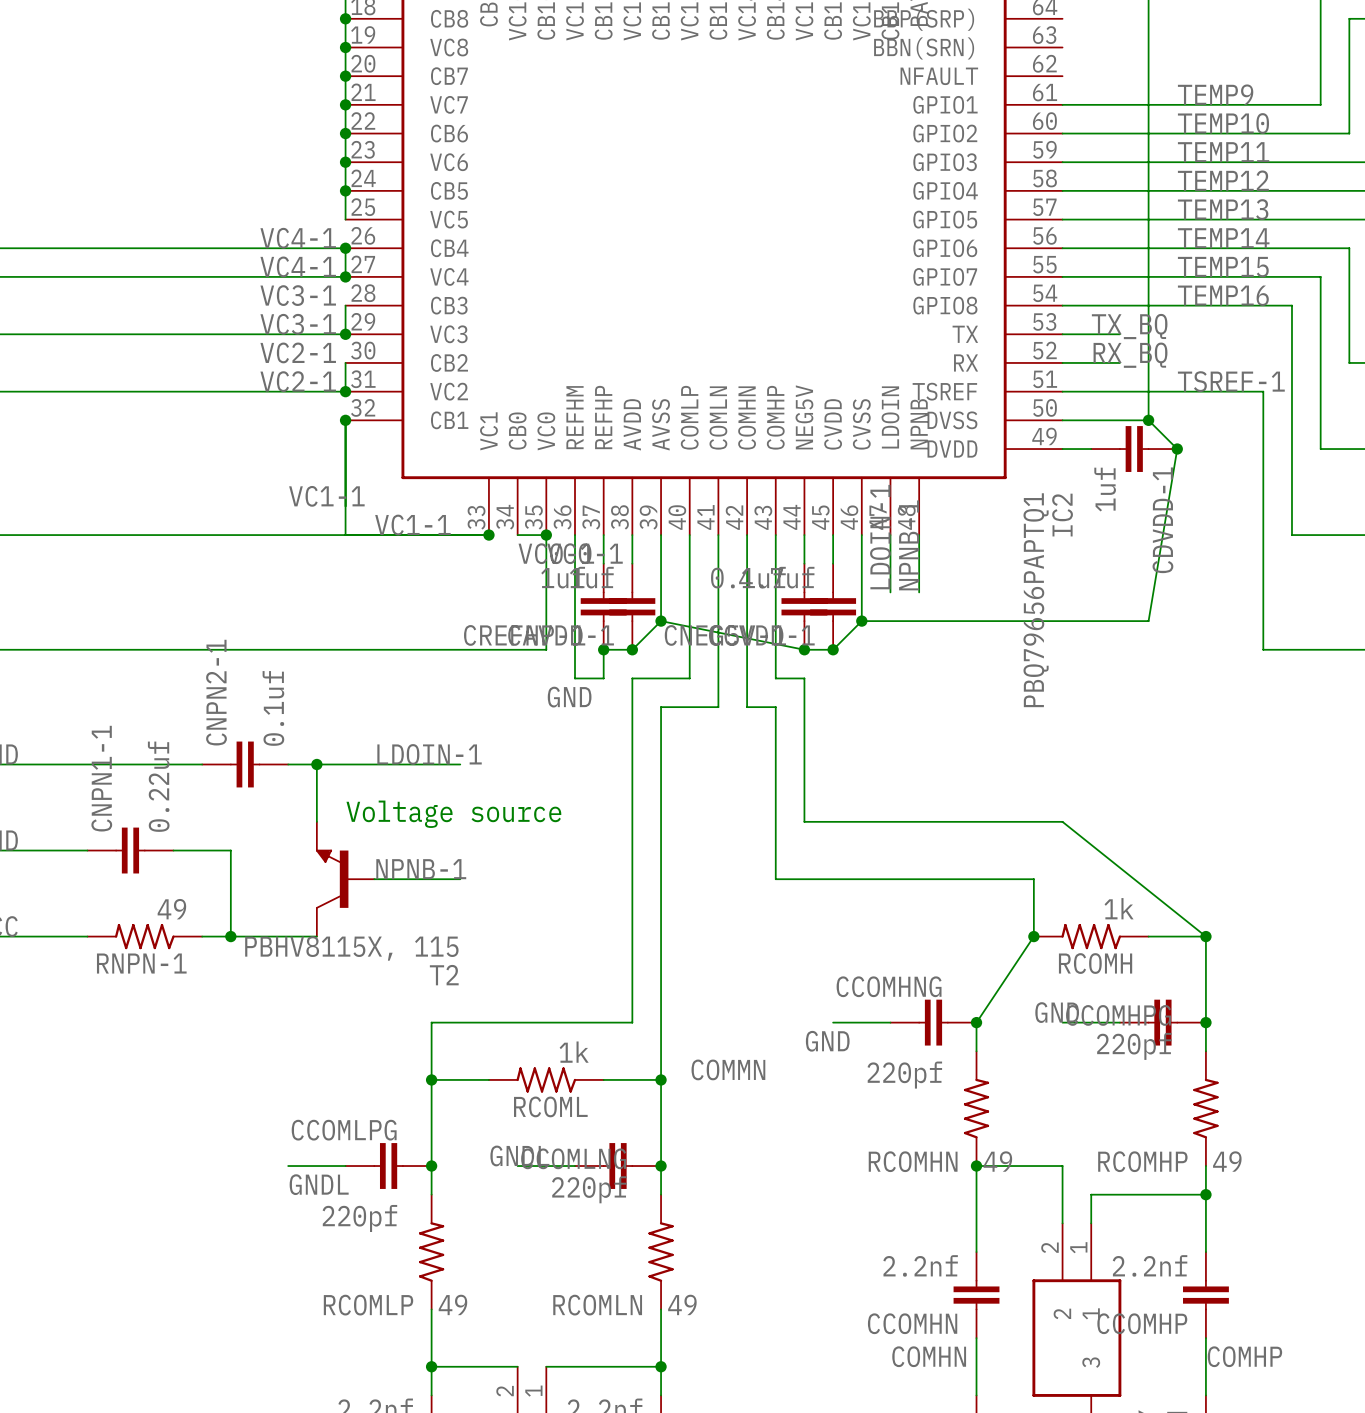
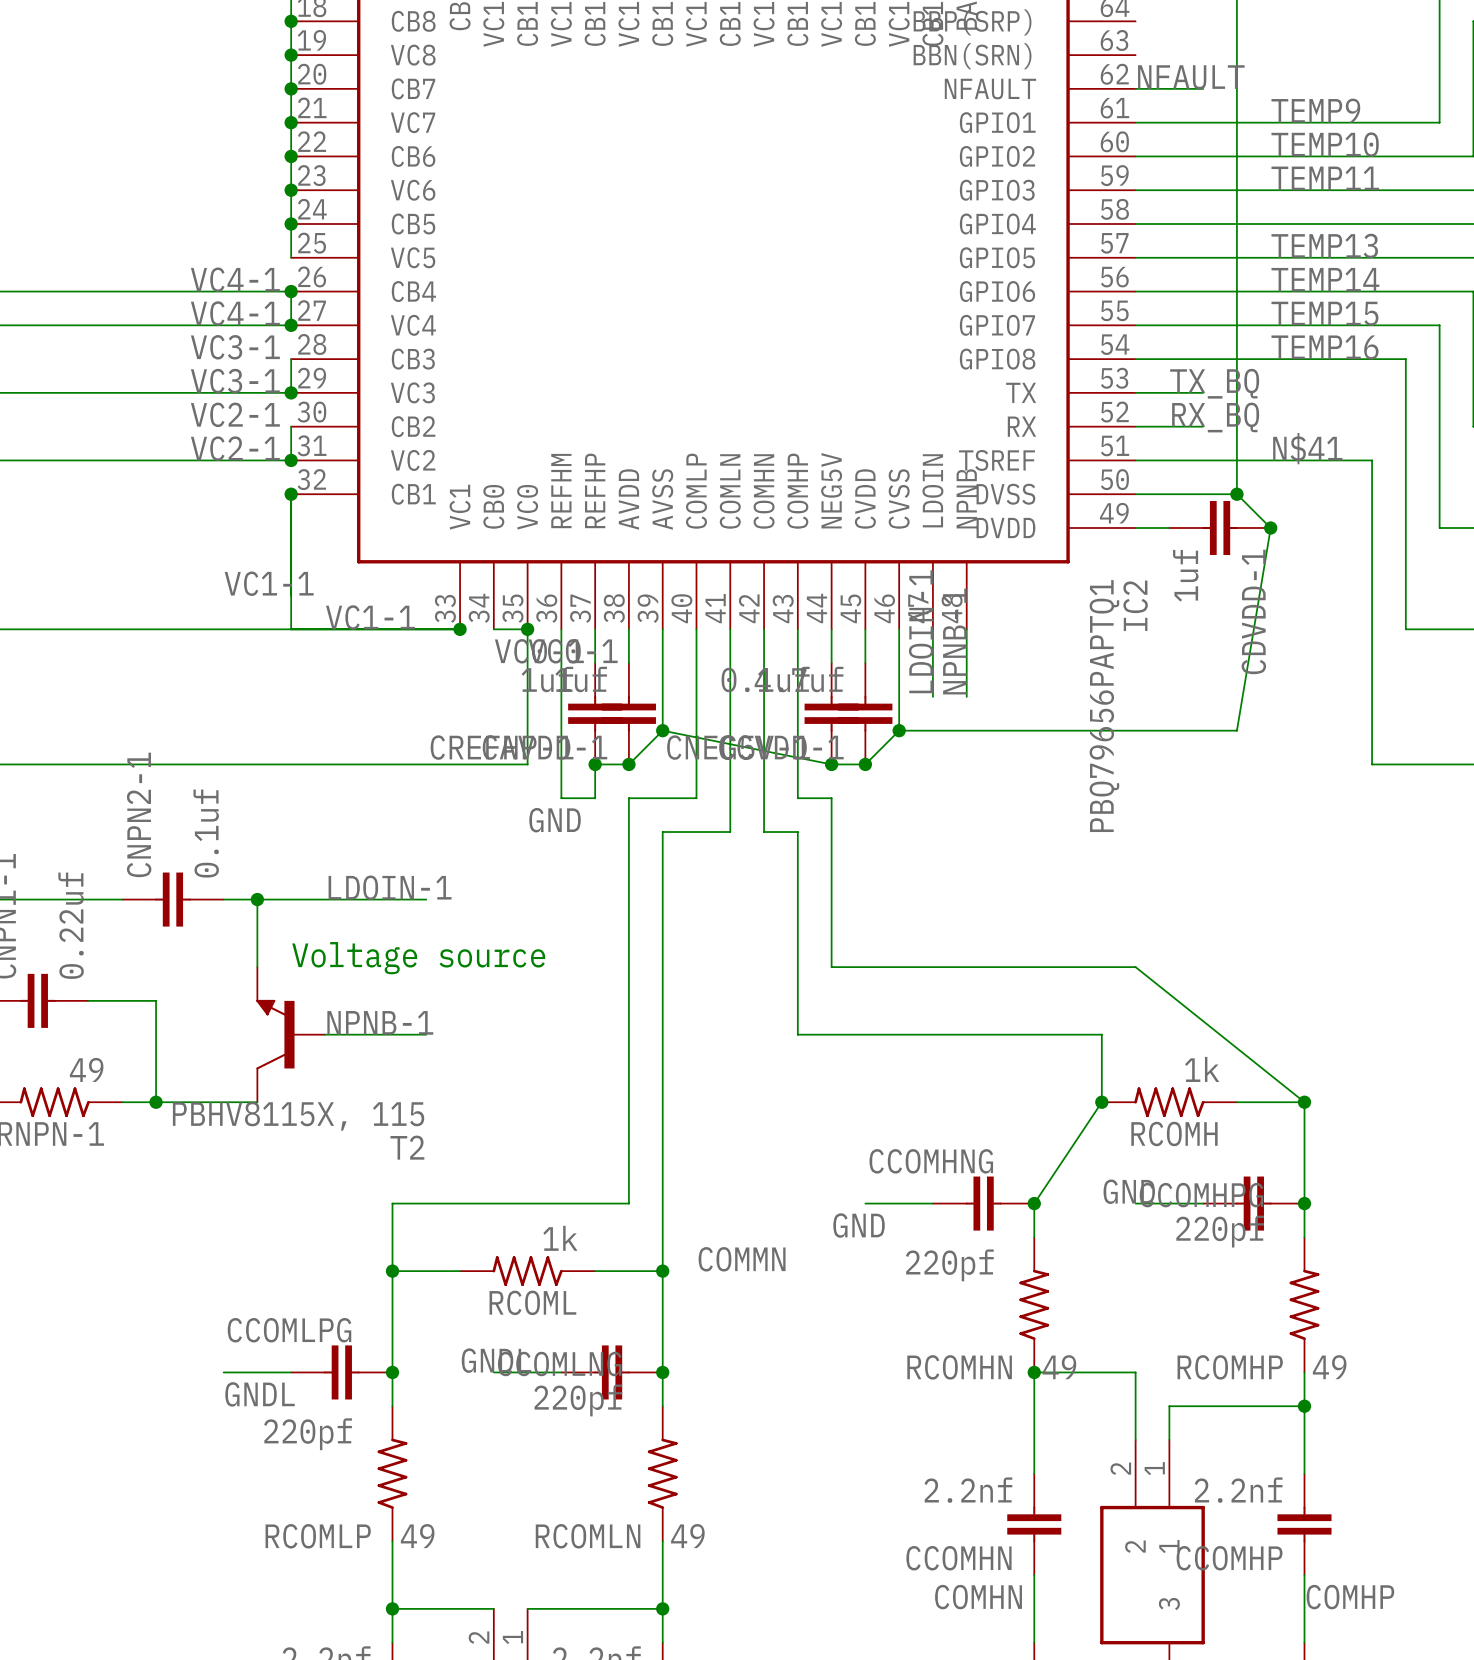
label: none -> NFAULT (1191, 77)
wire: none -> (1135, 88) (1203, 88)
label: TEMP12 (1223, 180) -> none
label: TSREF-1 (1231, 381) -> N$41 (1307, 448)

